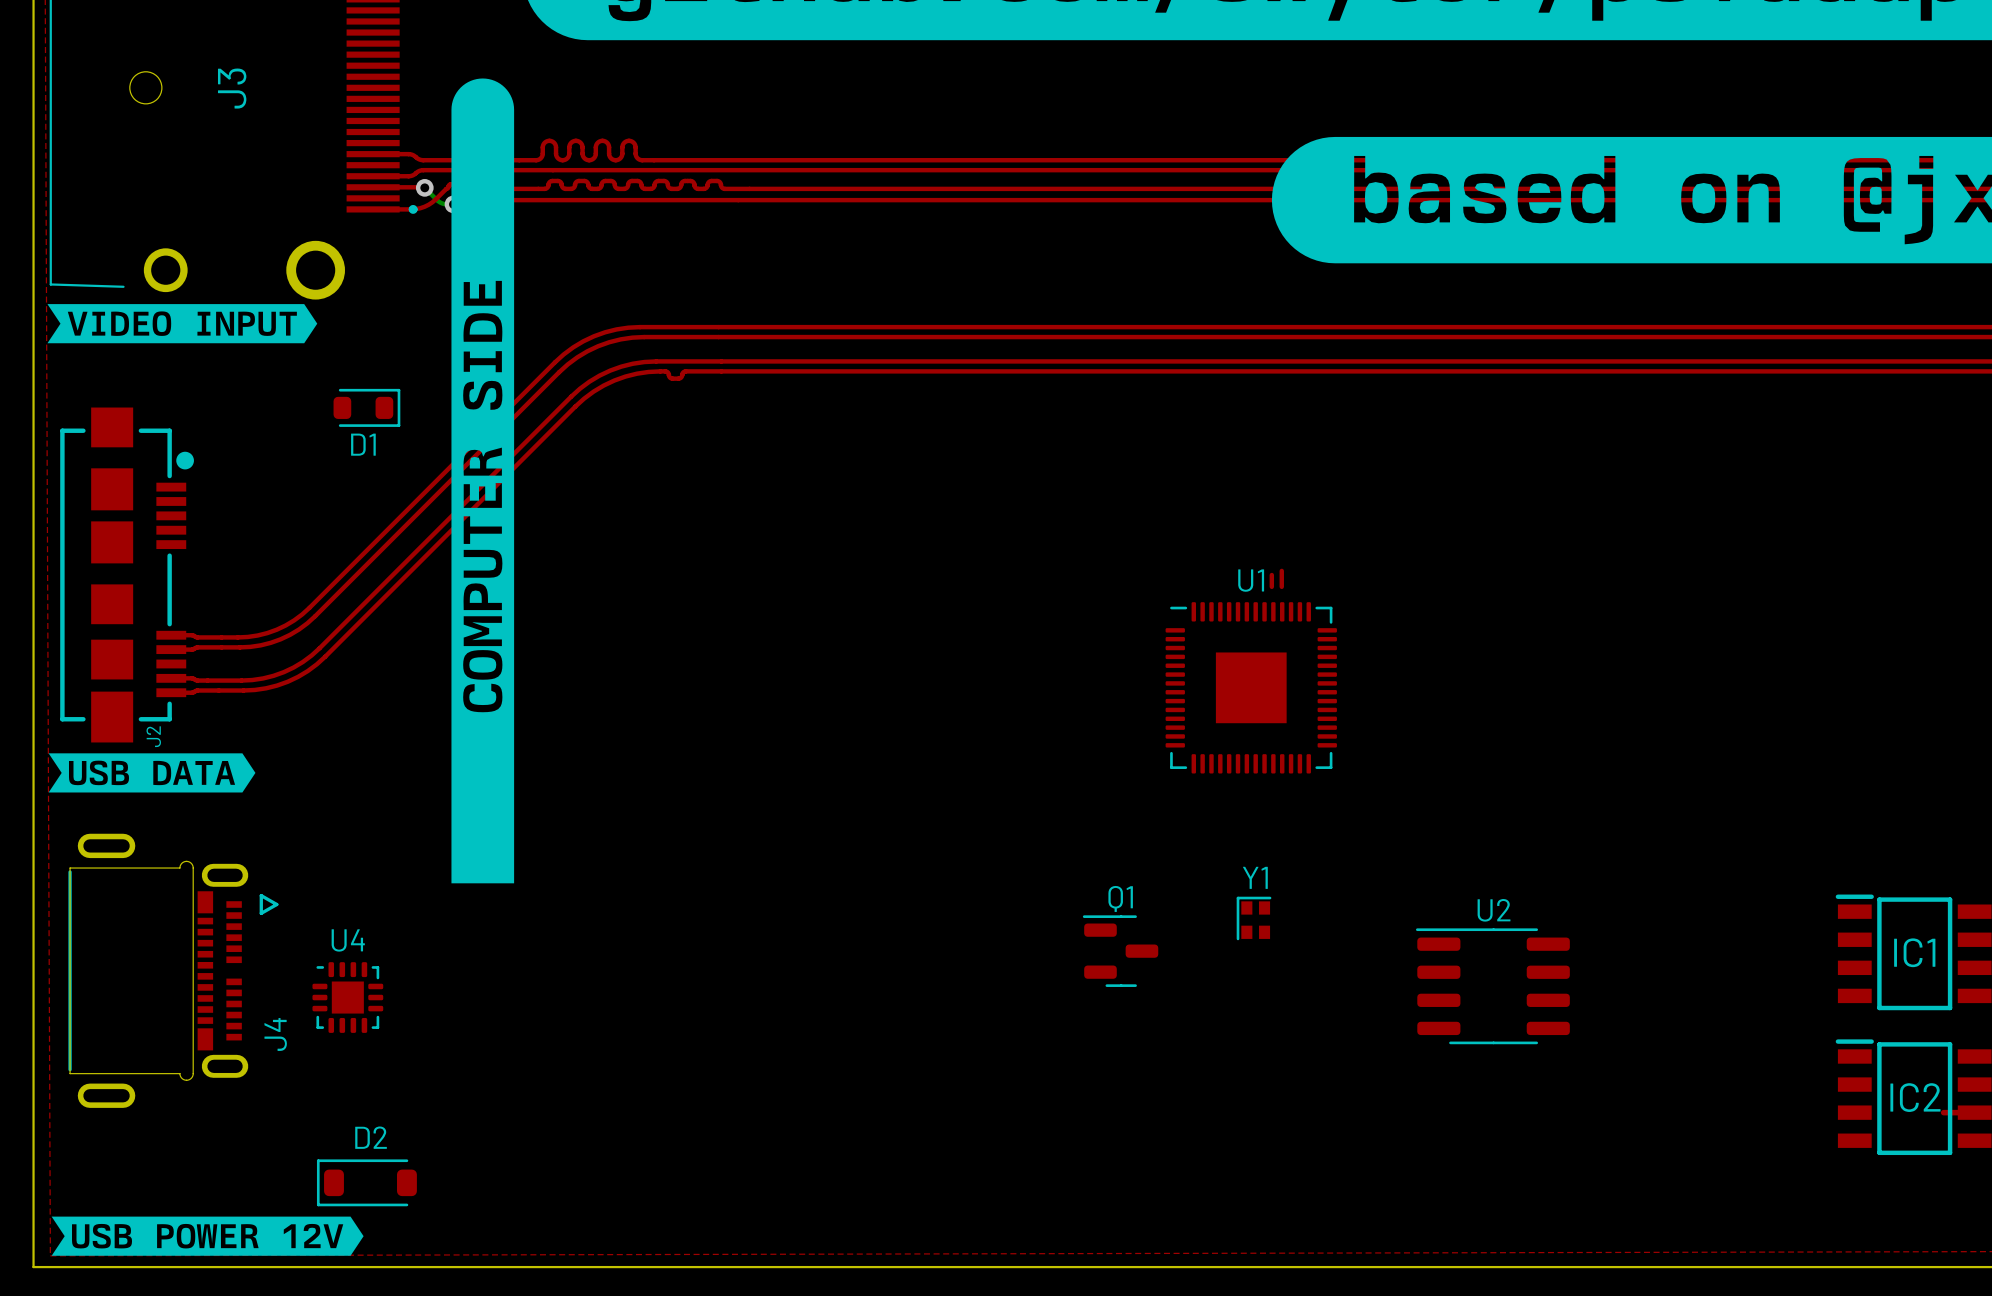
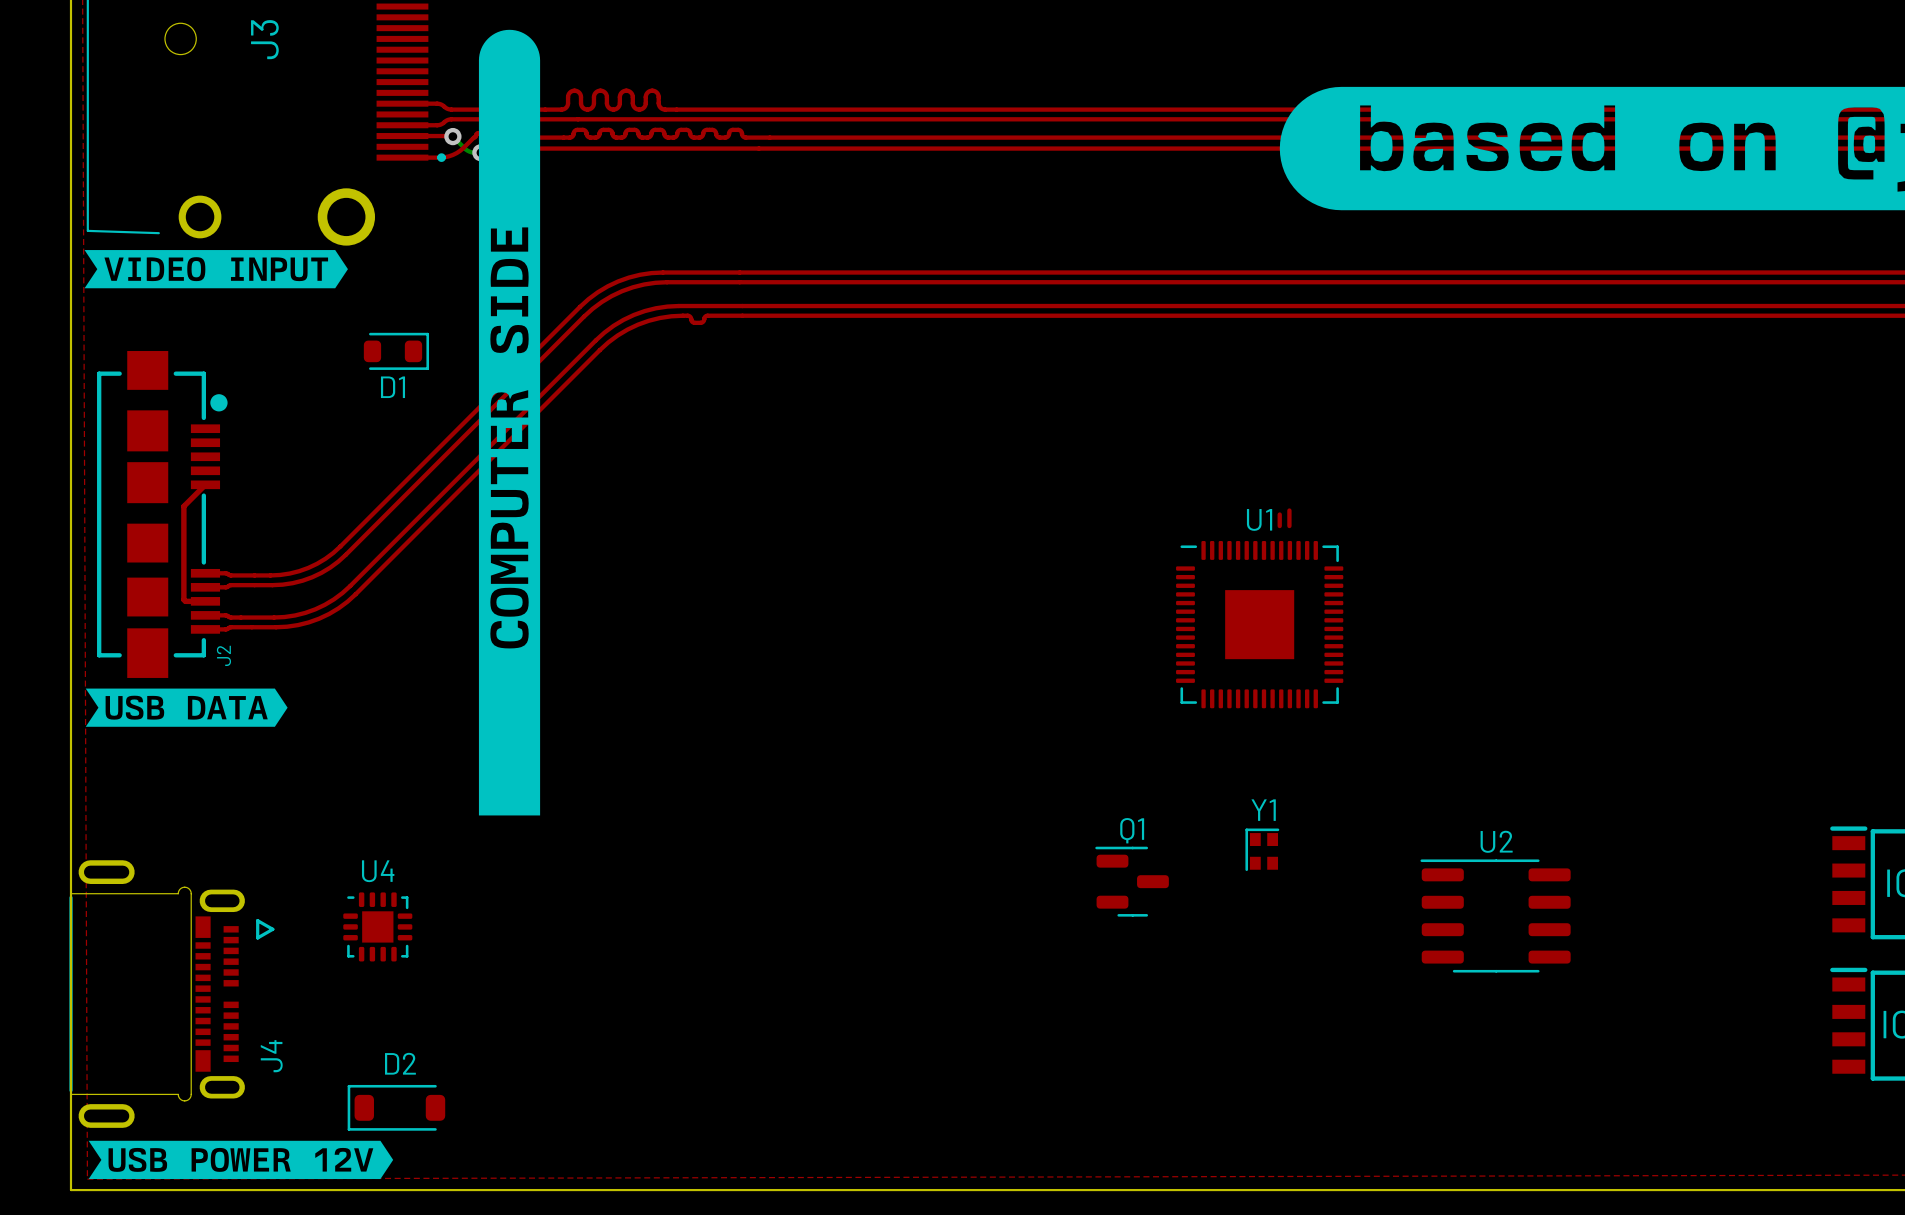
top track: none -> (205, 484) (183, 506) (183, 599) (205, 601)
J2 name position: J2 (153, 736) -> J2 (223, 655)
J4 position: (173, 970) -> (171, 994)

